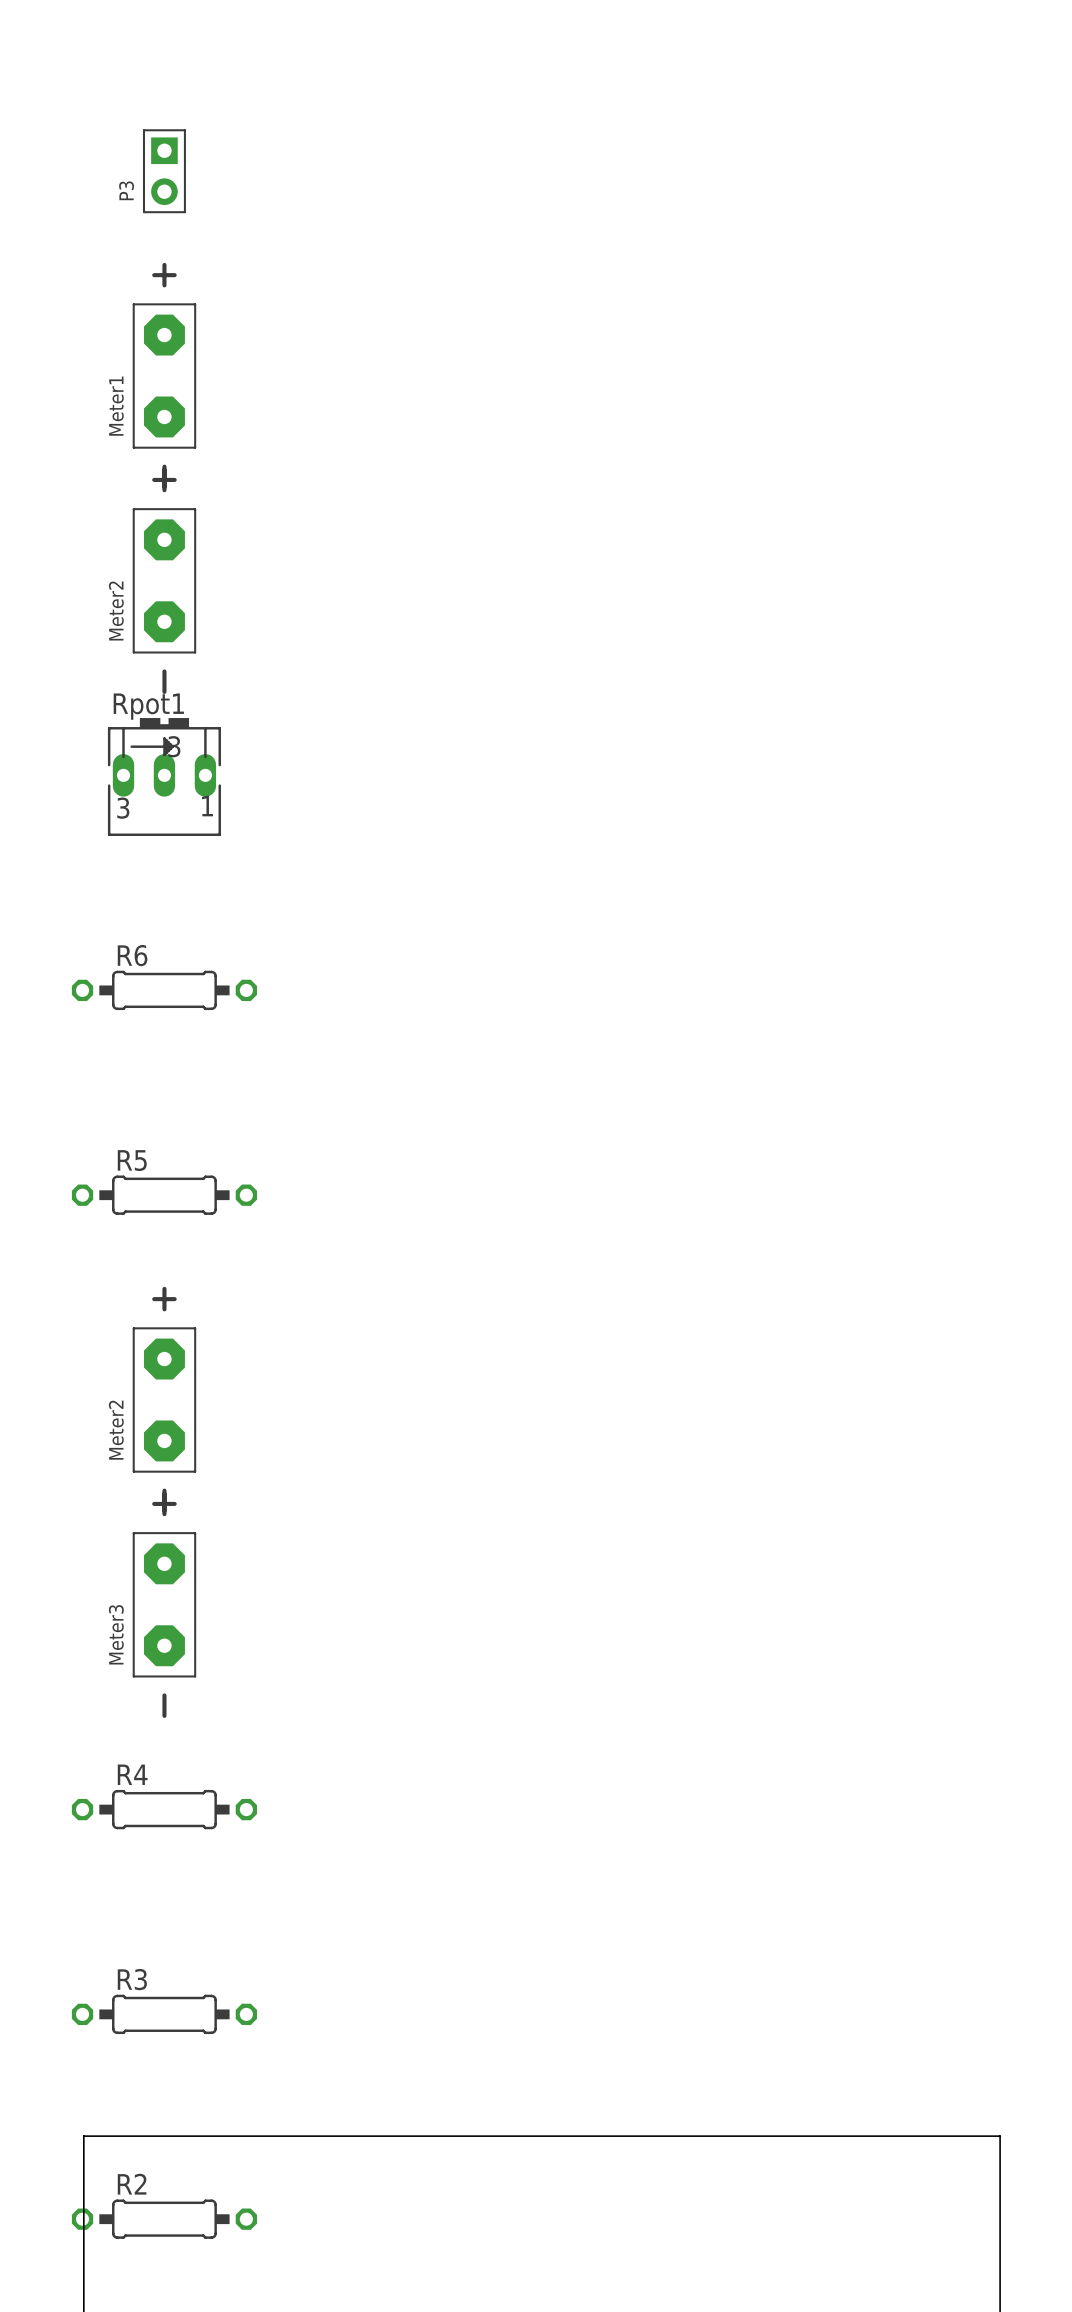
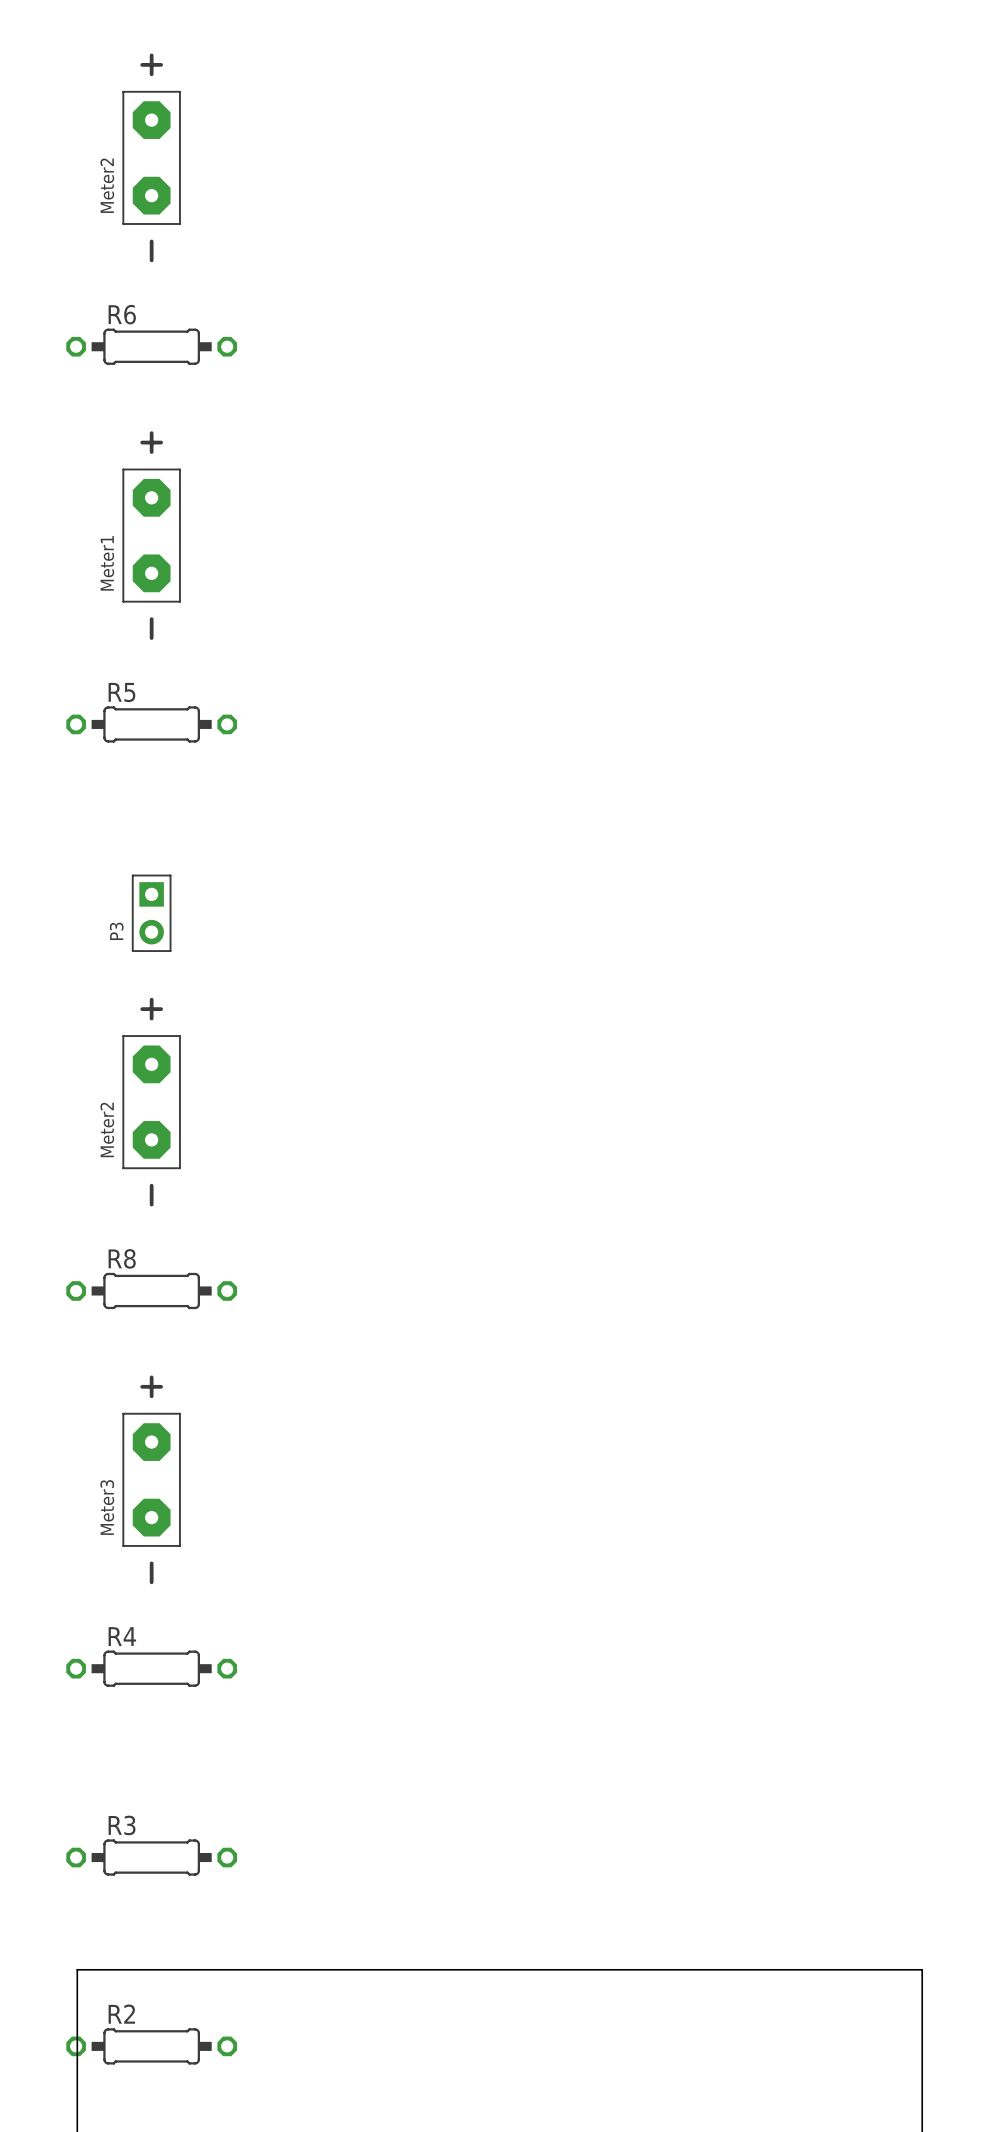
P3 position: (164, 171) -> (151, 913)
Meter2: none -> (151, 157)
Meter1: (164, 376) -> none
Meter2 name: Meter2 (116, 611) -> Meter1 (107, 563)
Rpot1: (164, 777) -> none
R6 position: (164, 990) -> (151, 346)
R5 position: (164, 1195) -> (151, 724)
Meter2 position: (164, 1399) -> (151, 1102)
R8: none -> (151, 1290)

